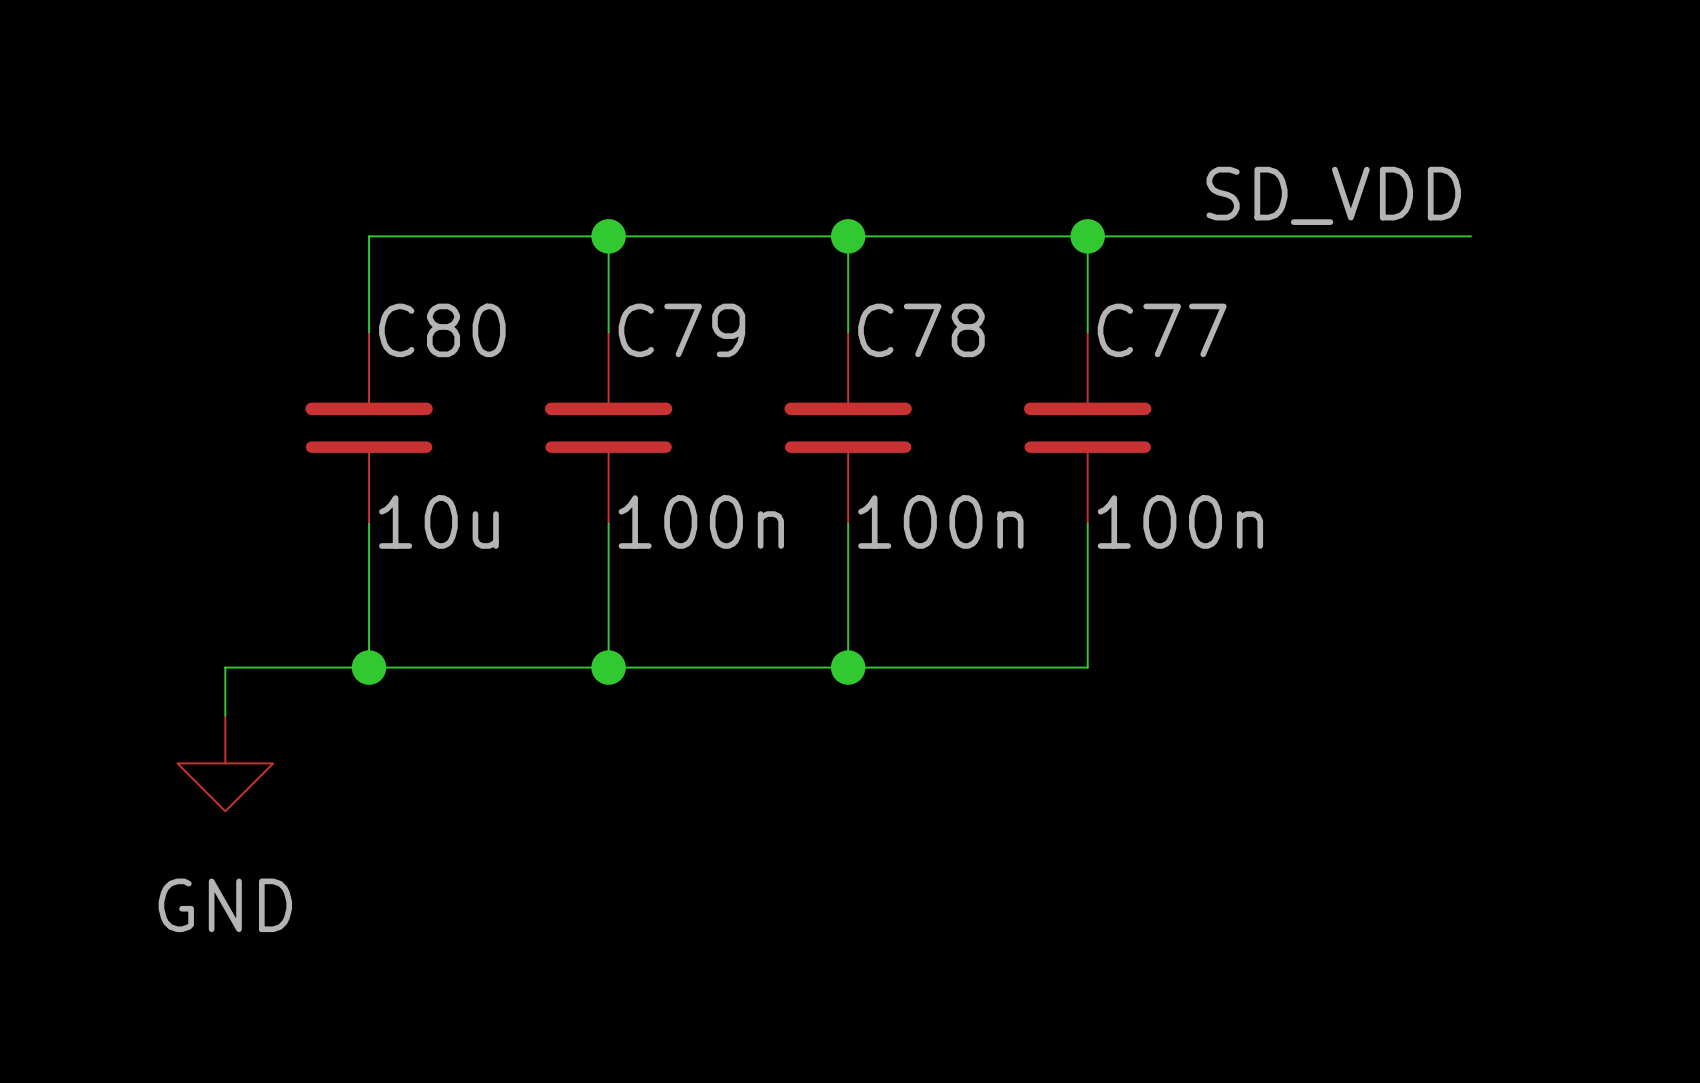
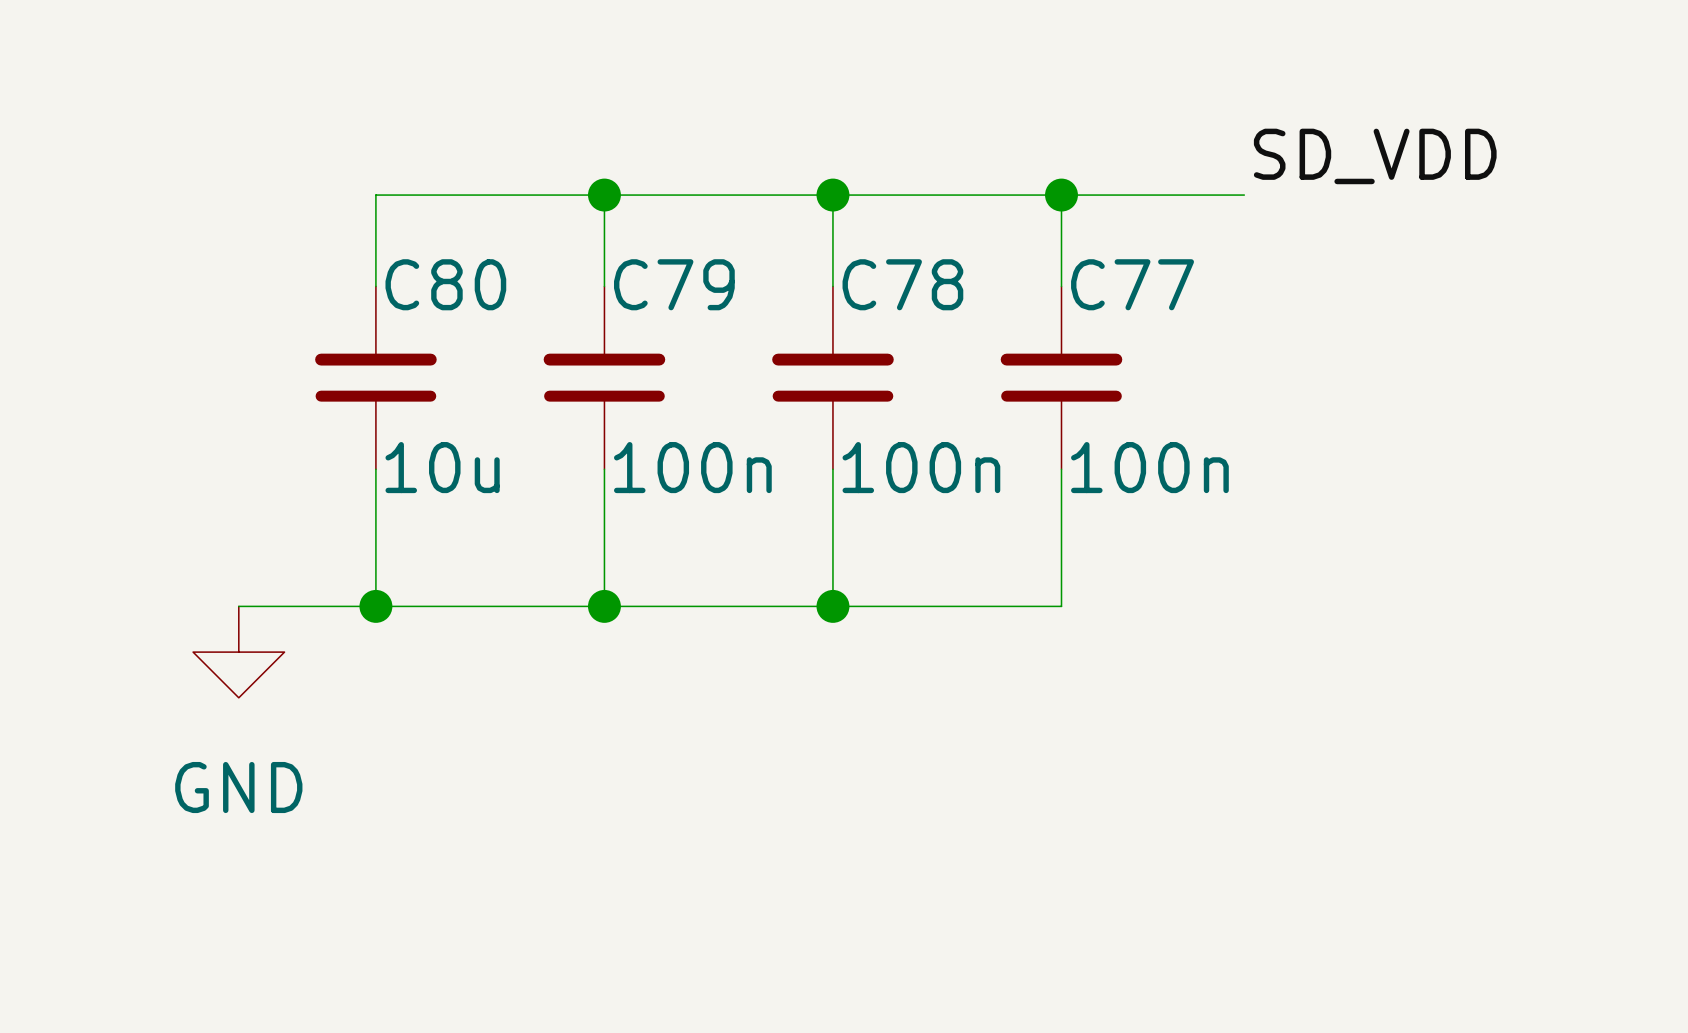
label position: SD_VDD (1333, 195) -> SD_VDD (1375, 156)
wire: (1279, 236) (1470, 236) -> none
power symbol position: GND (225, 763) -> GND (238, 652)

